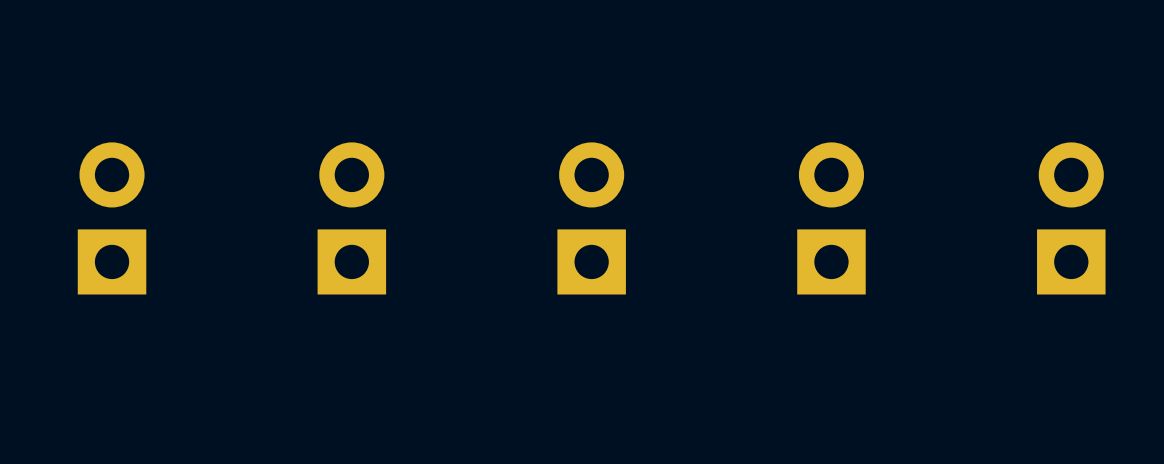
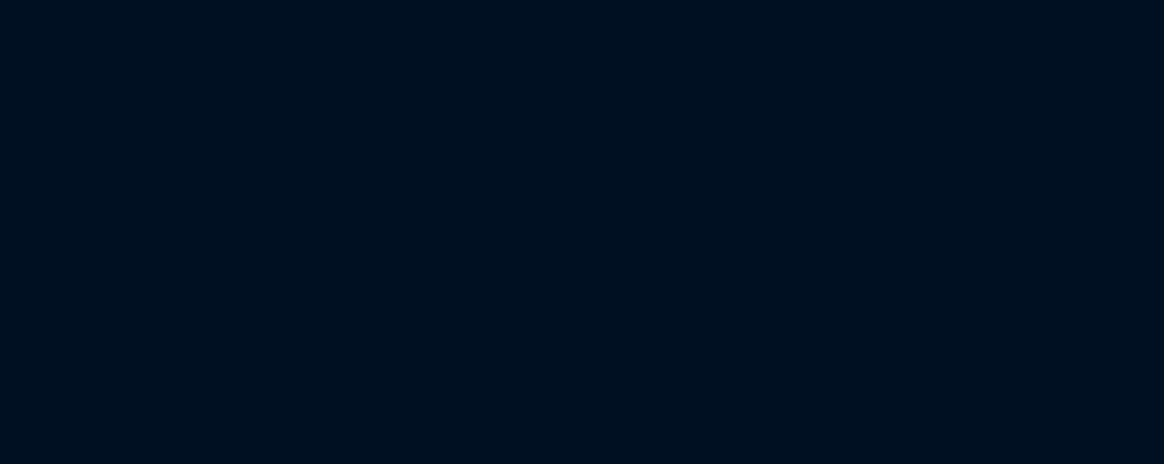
part: (112, 218) -> none
part: (351, 218) -> none
part: (591, 218) -> none
part: (831, 218) -> none
part: (1071, 218) -> none

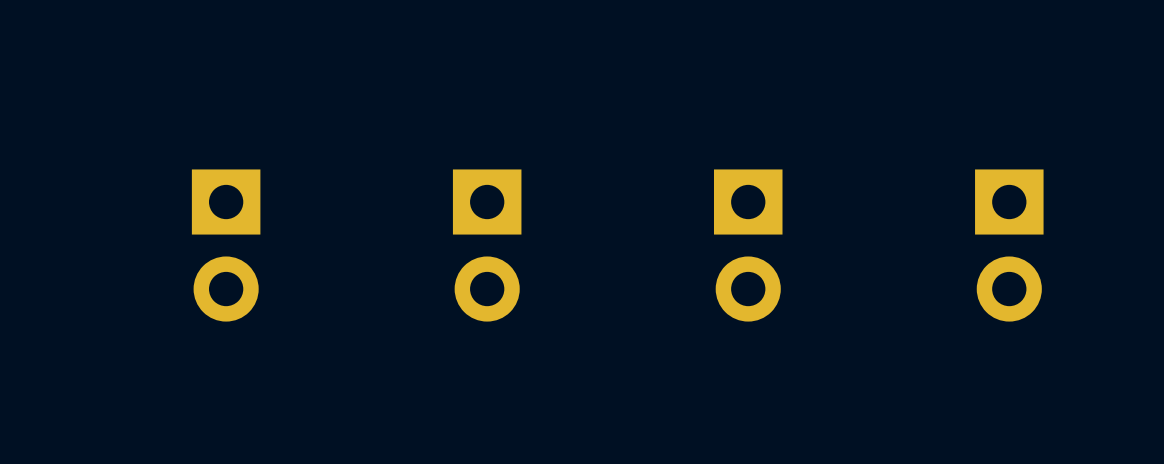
part: none -> (226, 245)
part: none -> (487, 245)
part: none -> (748, 245)
part: none -> (1009, 245)

